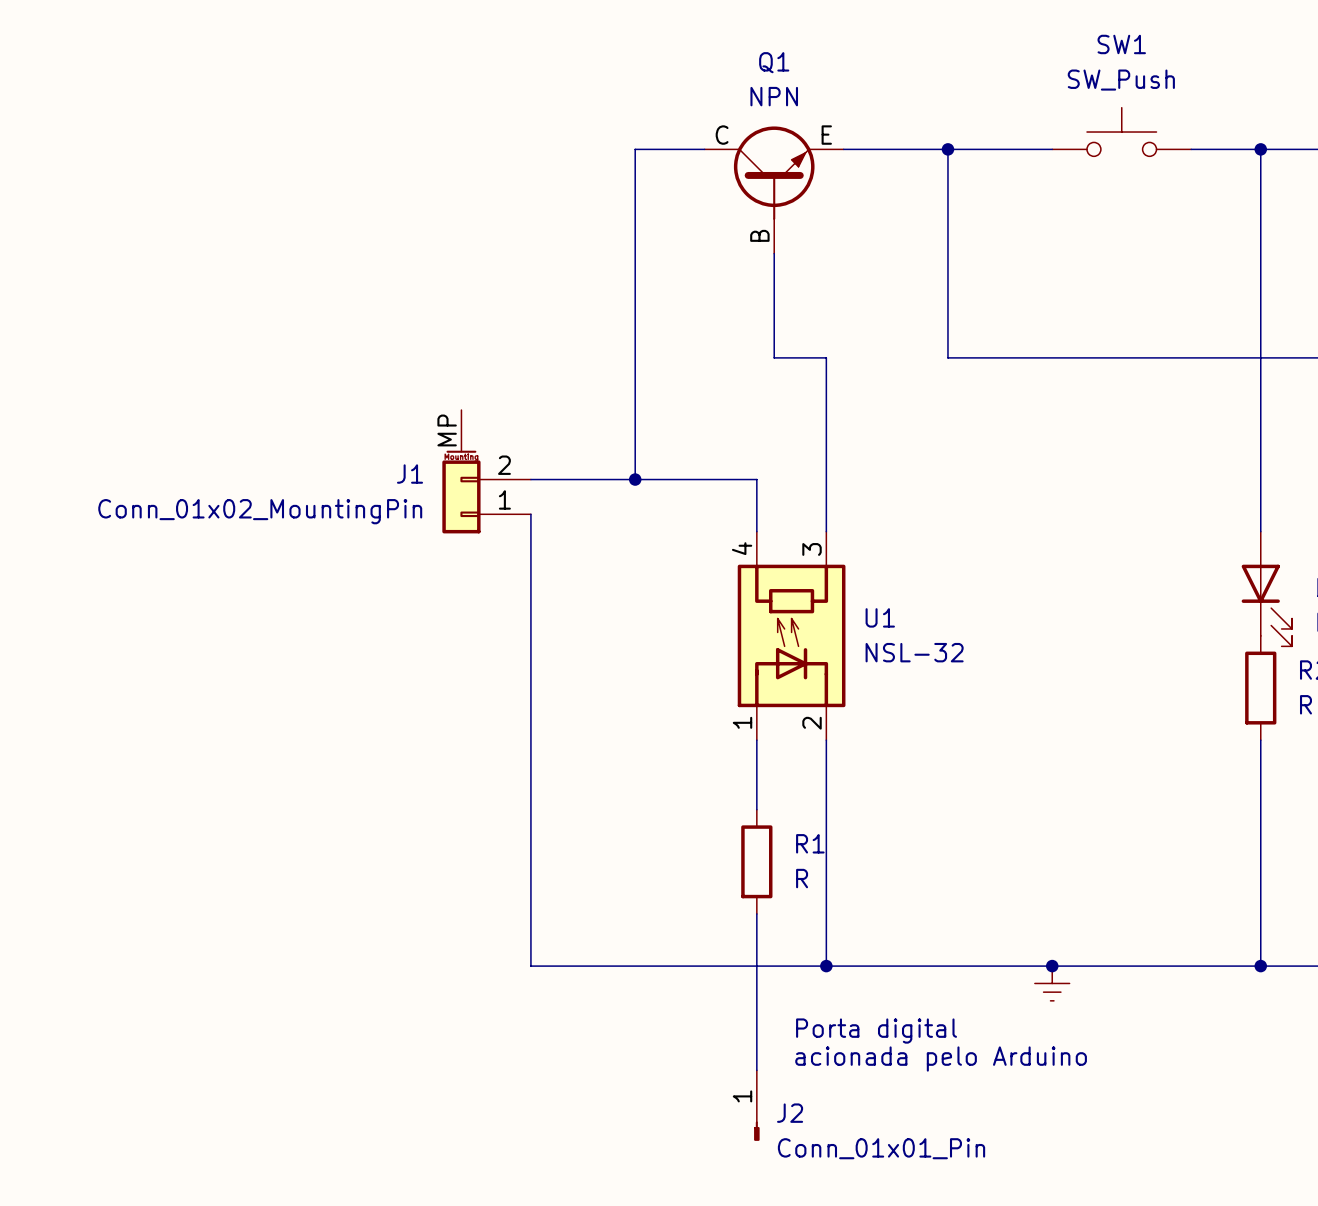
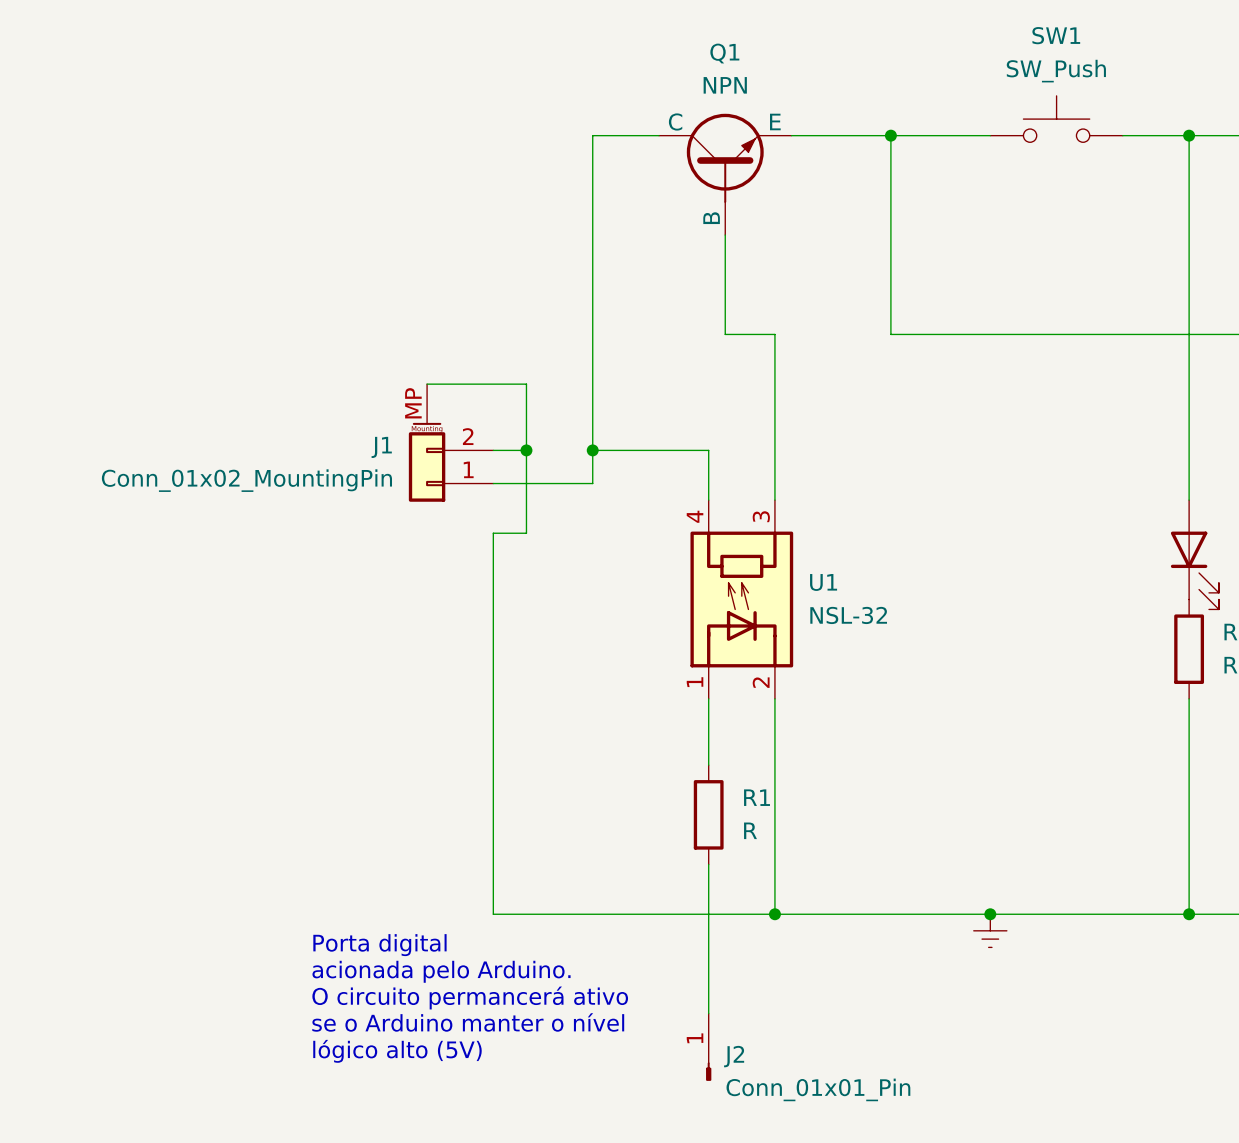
wire: (565, 479) (635, 479) -> (493, 483) (592, 483) (592, 450)
junction: none -> (526, 450)
wire: (530, 514) (530, 566) -> (427, 384) (526, 384) (526, 533) (493, 533)
text: none -> Porta digital (379, 945)
text: none -> acionada pelo Arduino. (441, 971)
text: Porta digital (876, 1031) -> none
text: none -> O circuito permancerá ativo (470, 997)
text: acionada pelo Arduino (941, 1059) -> none
text: none -> se o Arduino manter o nível (468, 1022)
text: none -> lógico alto (5V) (397, 1051)

